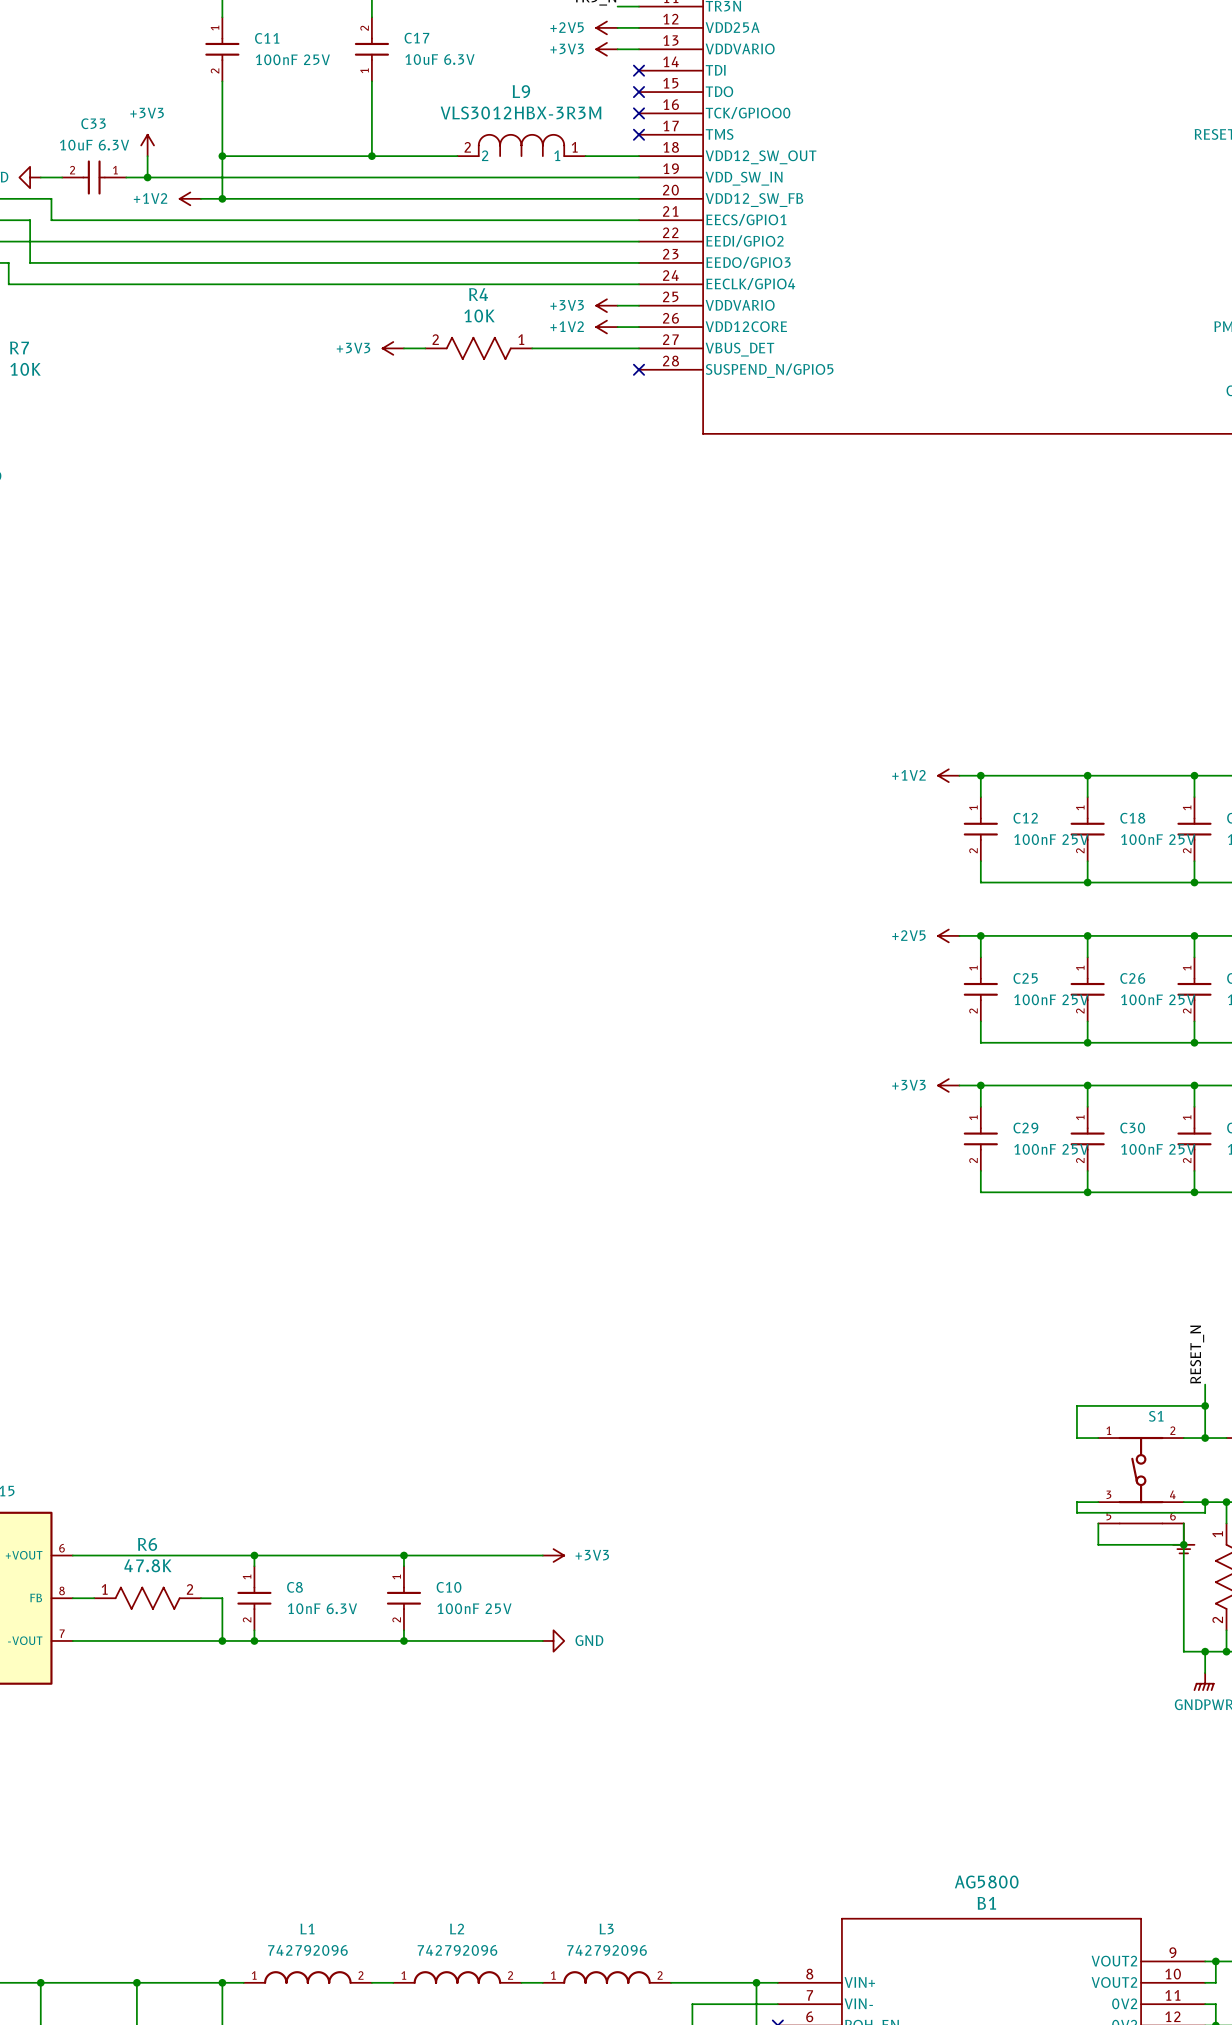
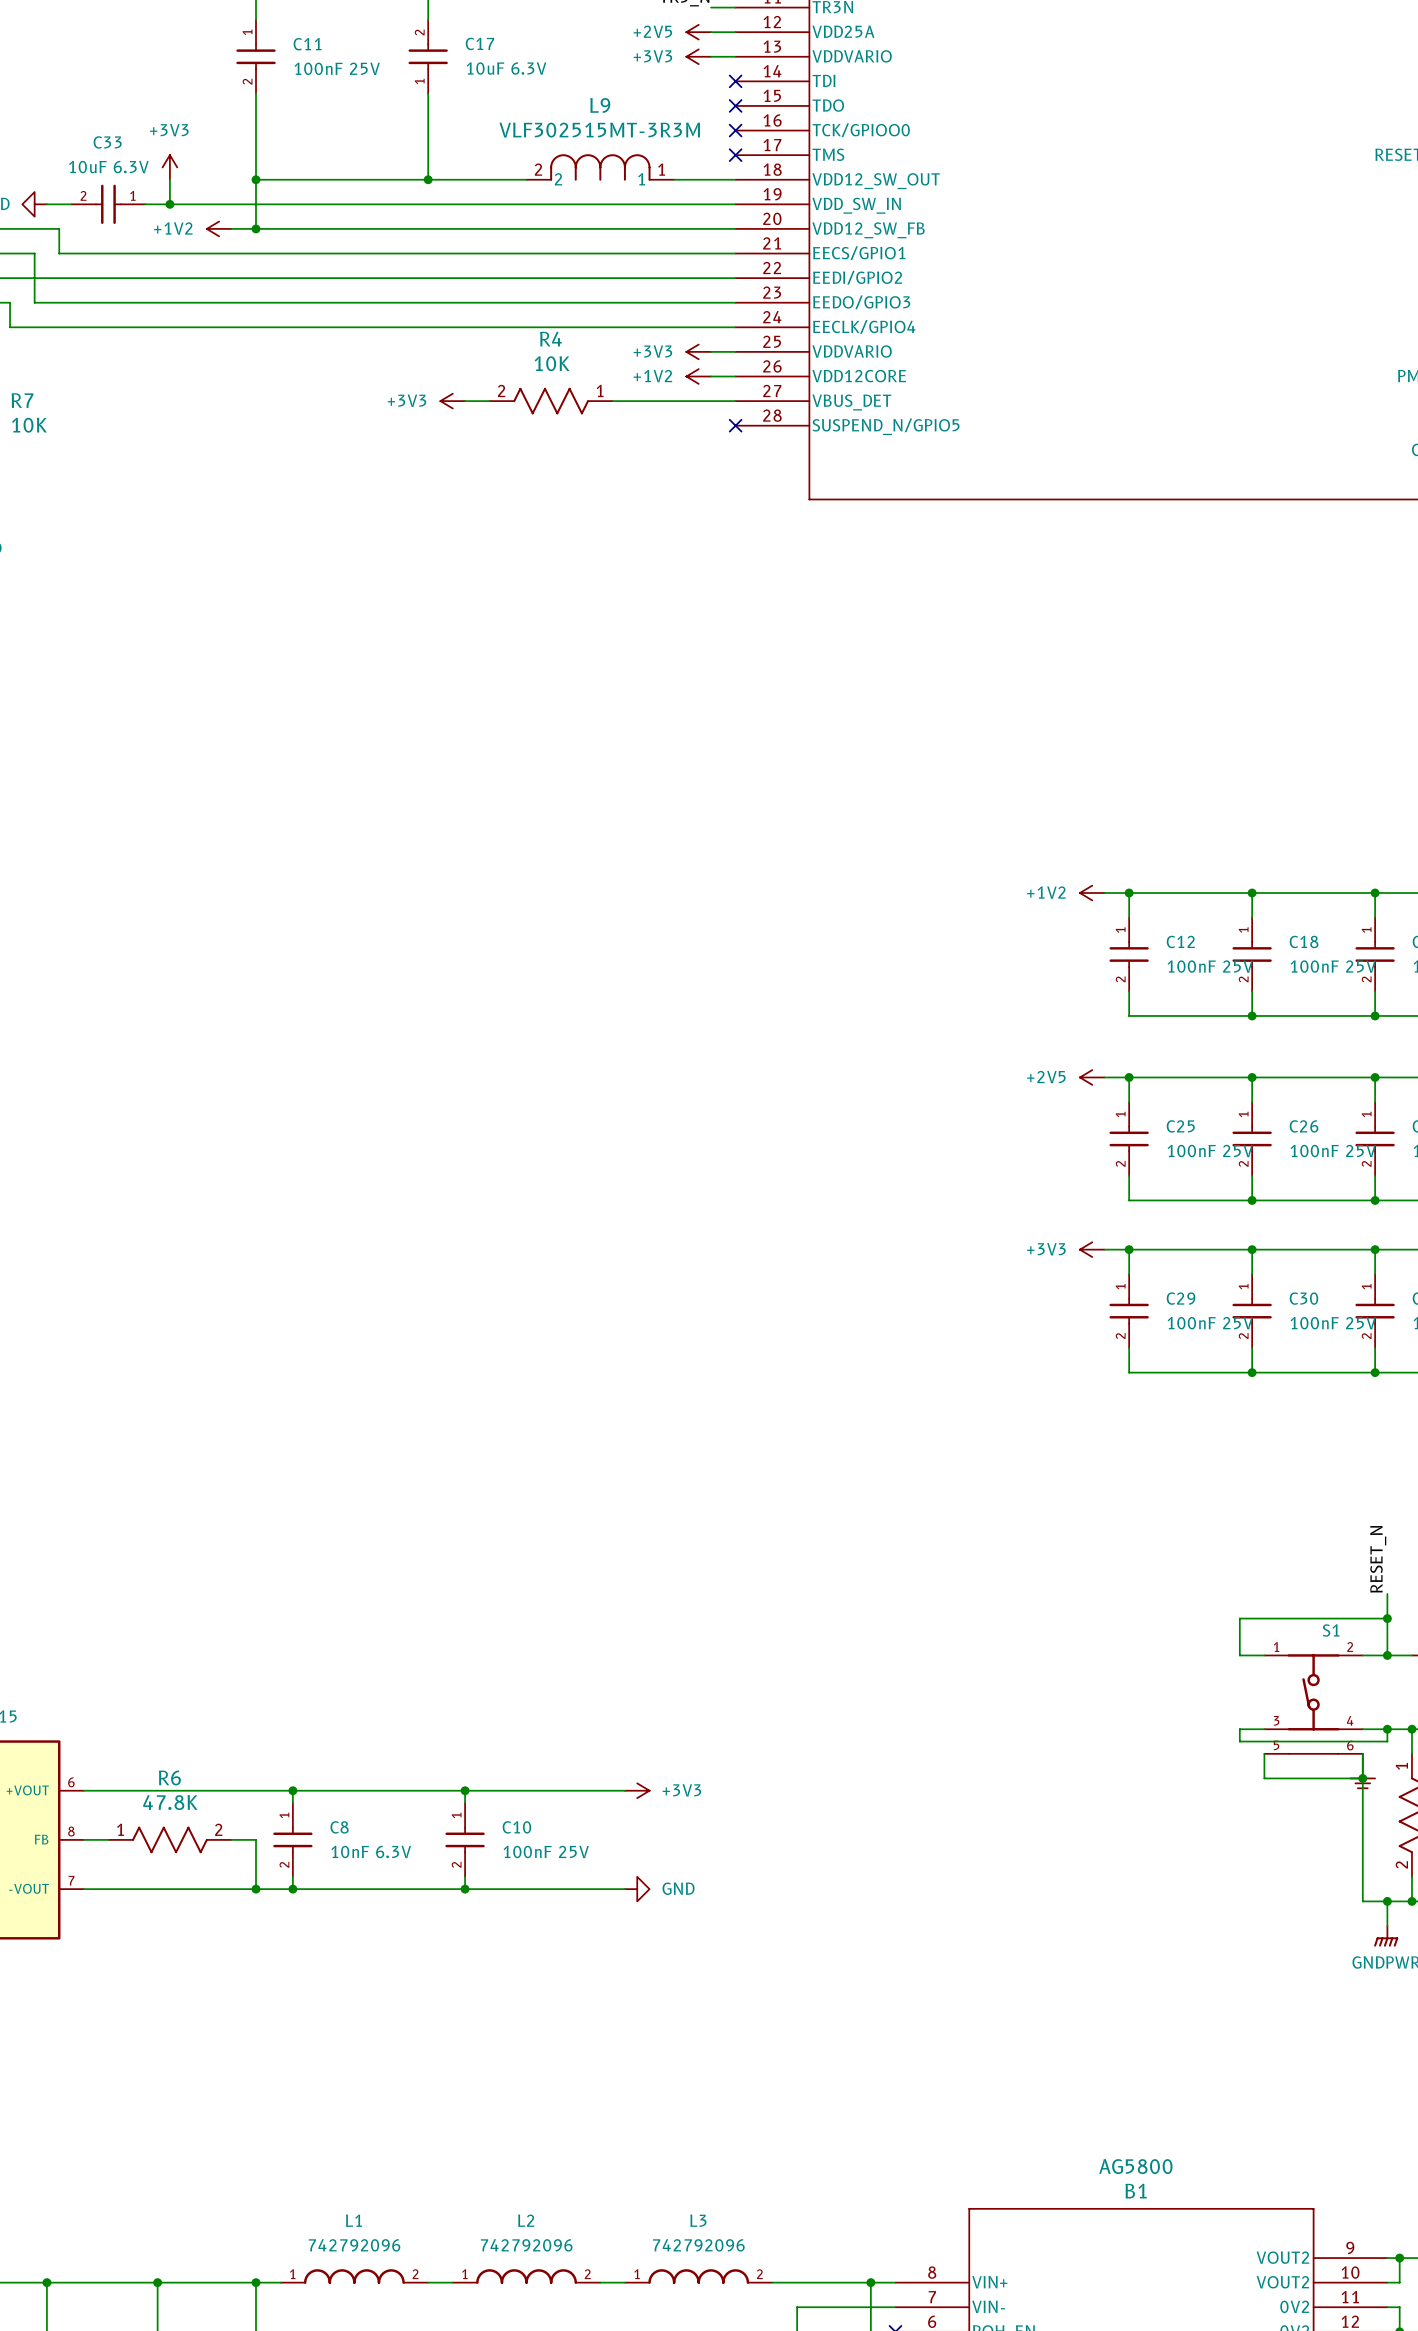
L9 value: VLS3012HBX-3R3M (520, 113) -> VLF302515MT-3R3M (599, 130)

